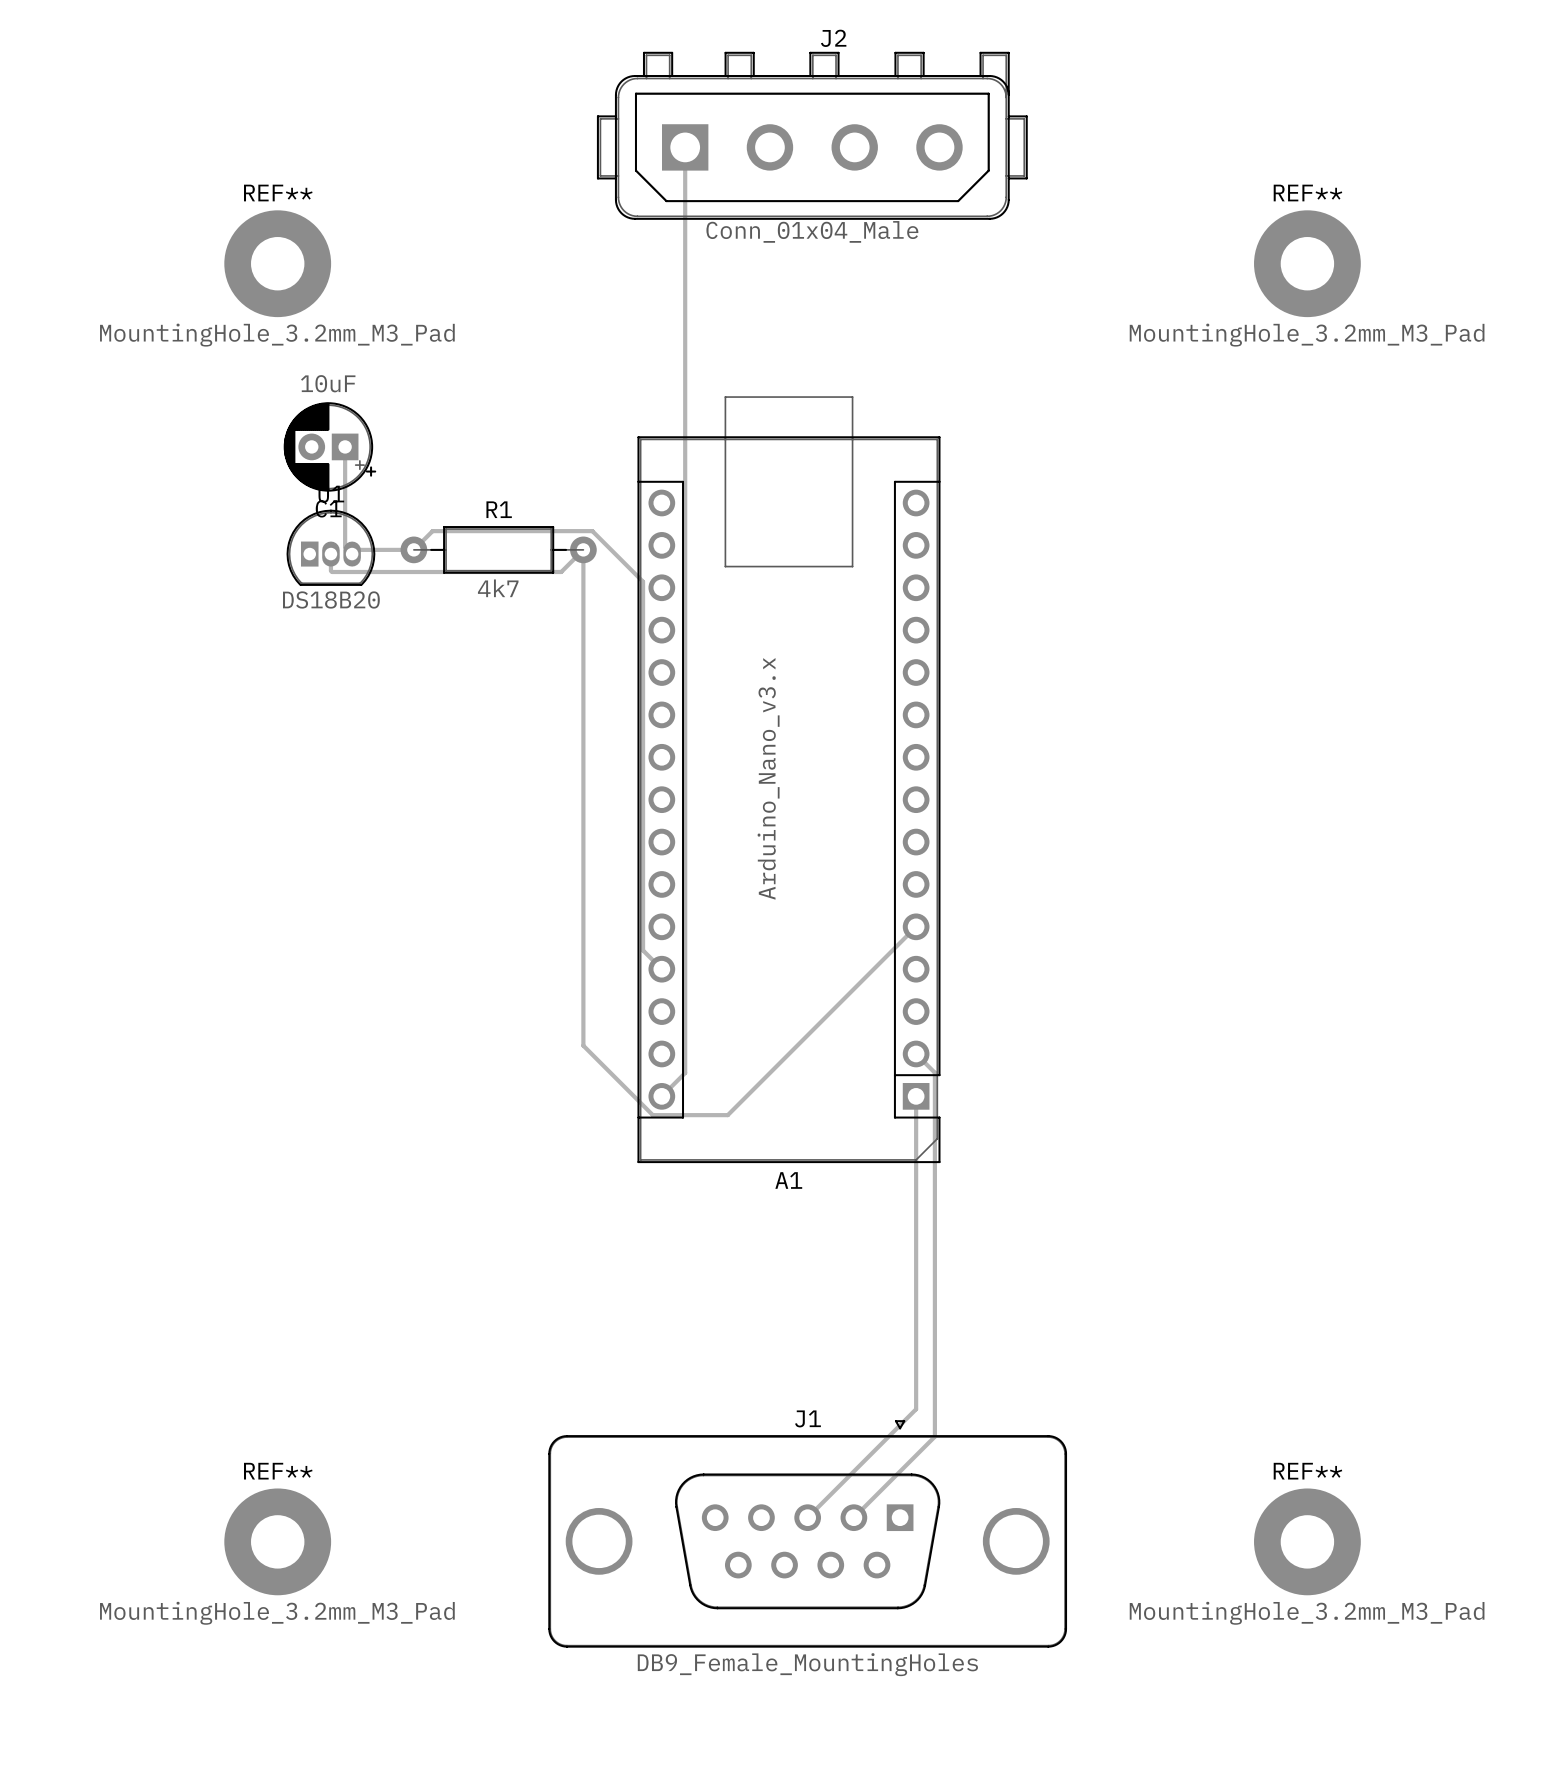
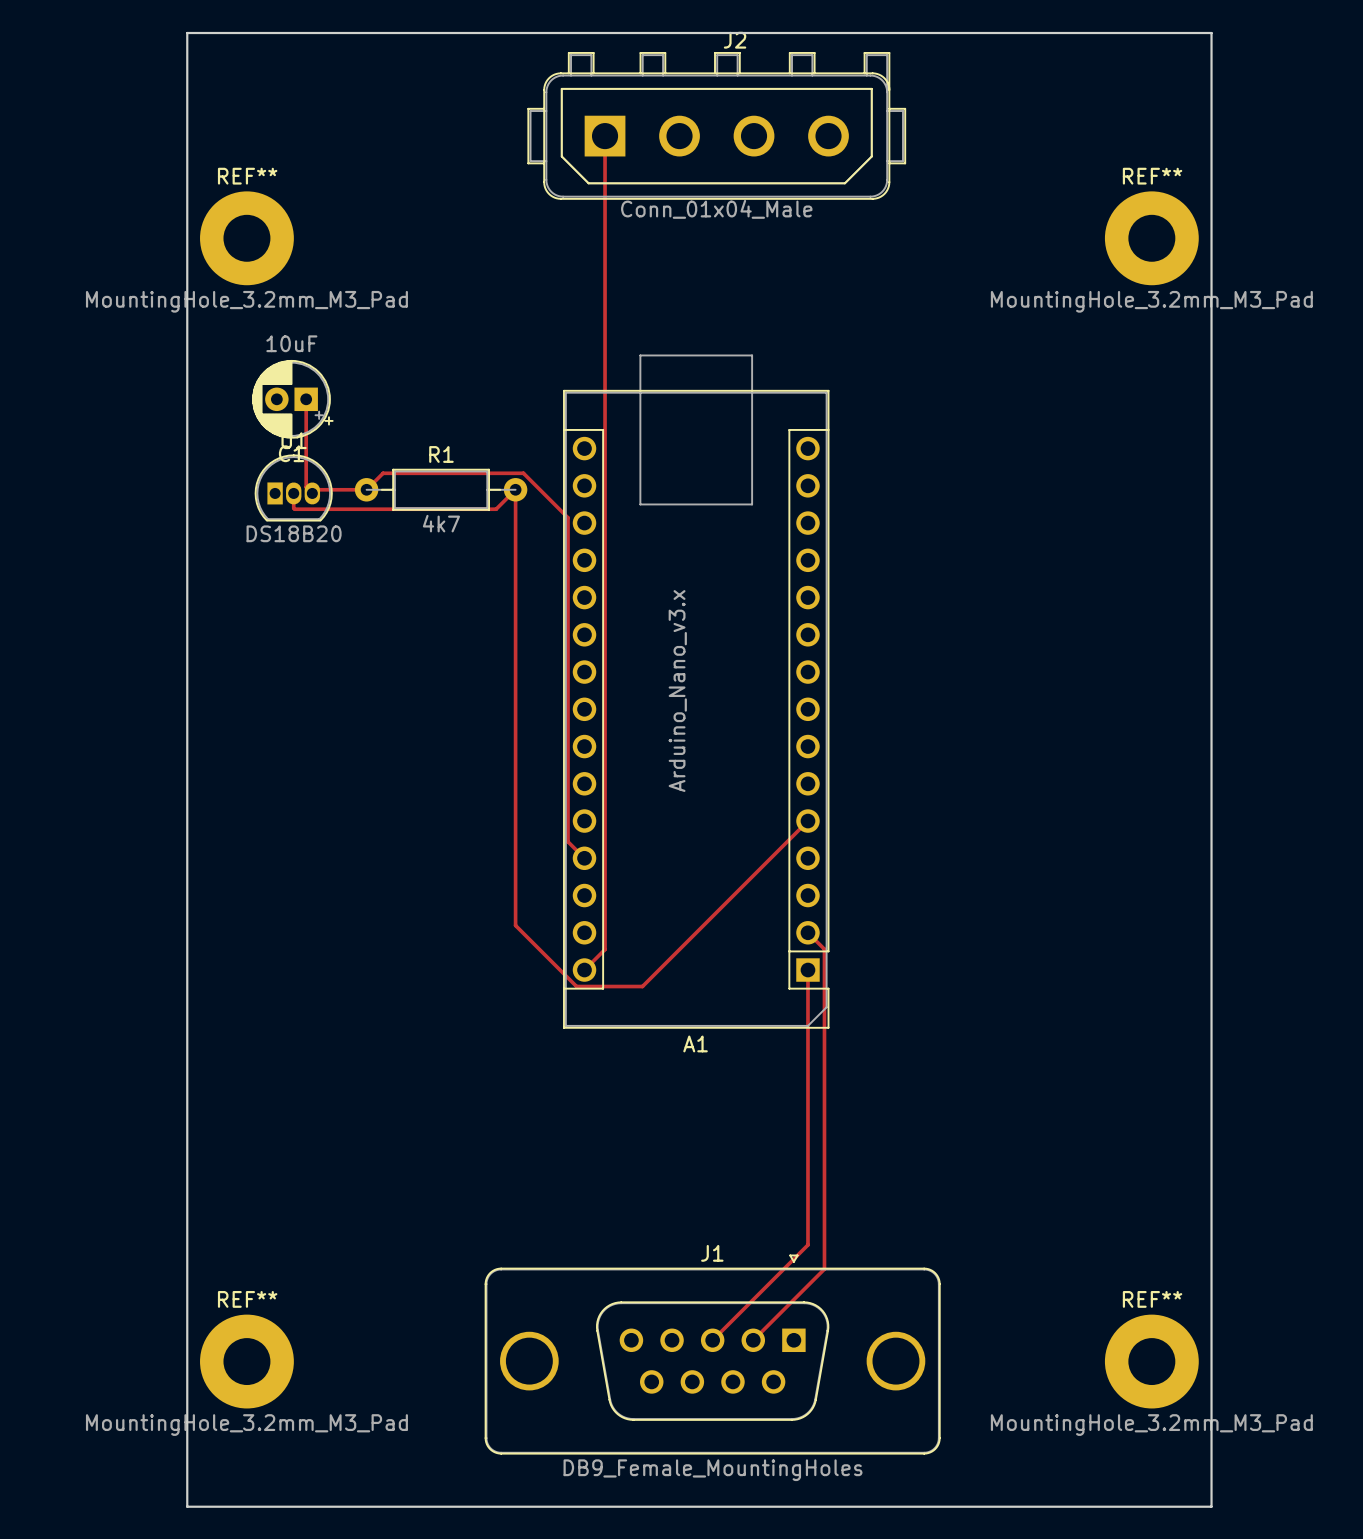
board edge: none -> (187, 33) (1211, 33) (1211, 1506) (187, 1506) (187, 33)

